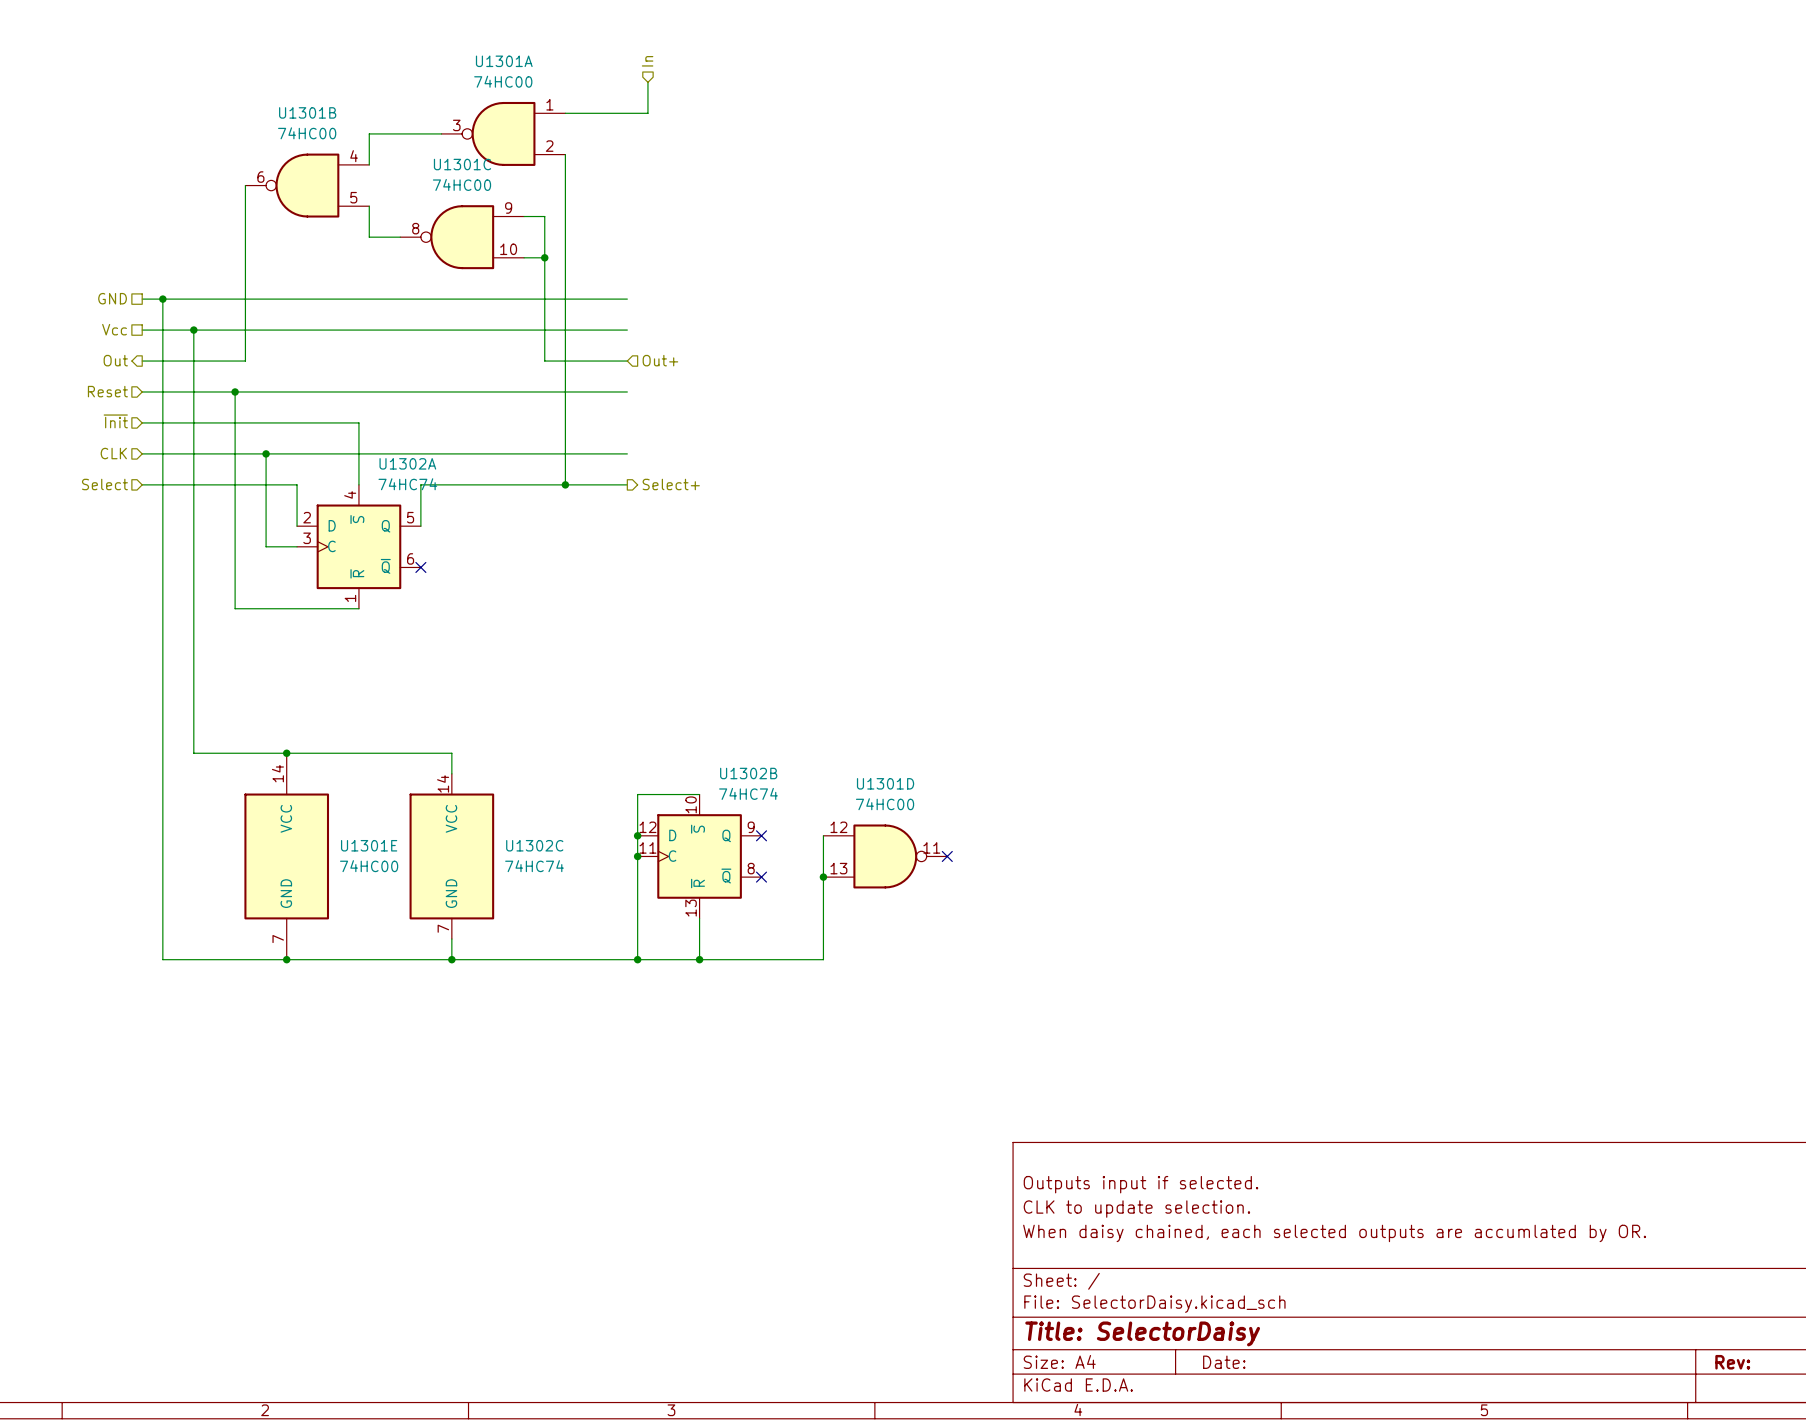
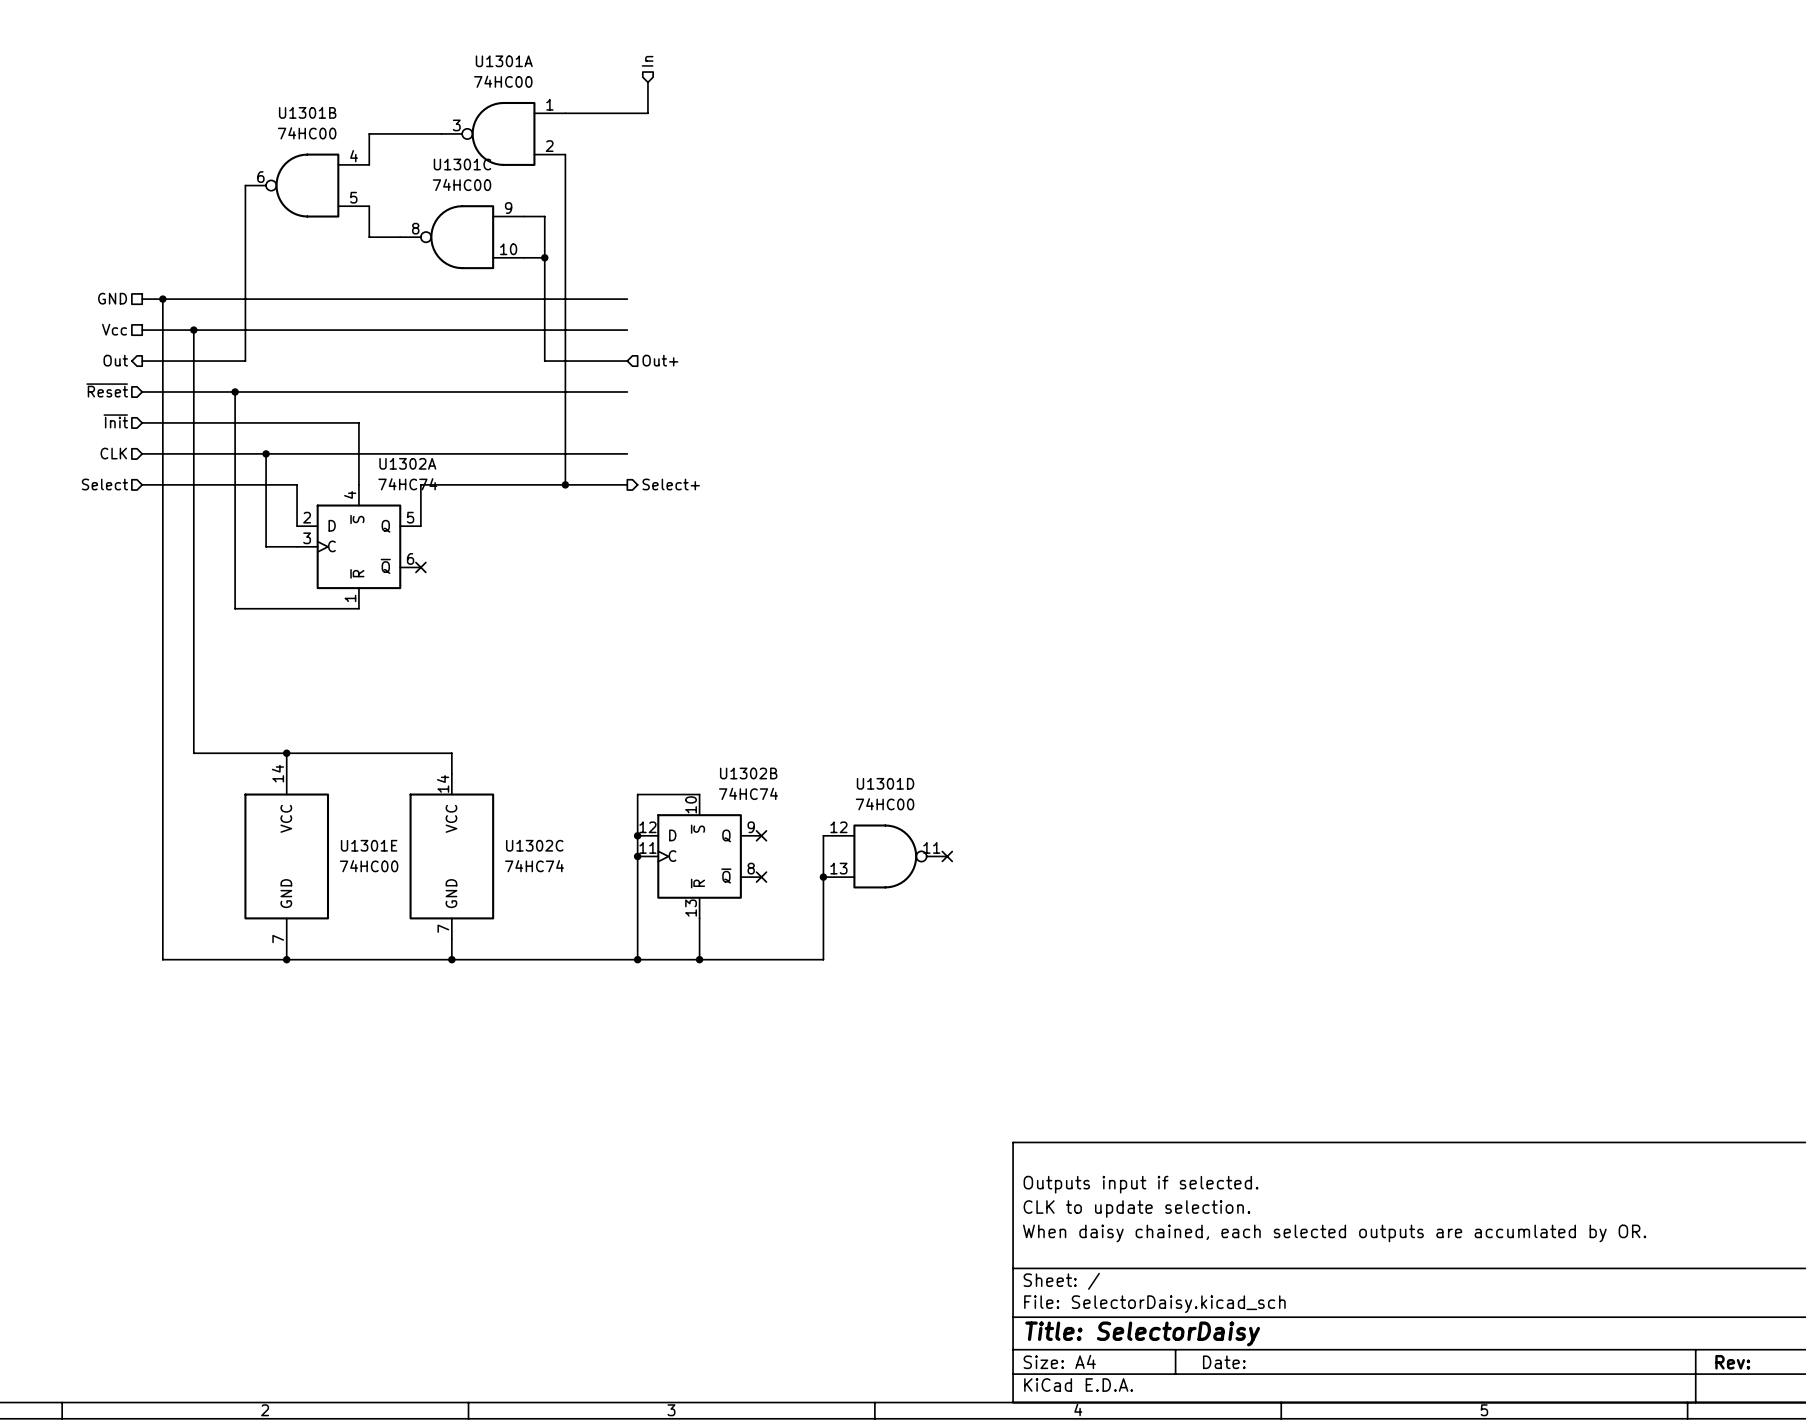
hierarchical label: Reset (107, 391) -> ~{Reset} (107, 390)

